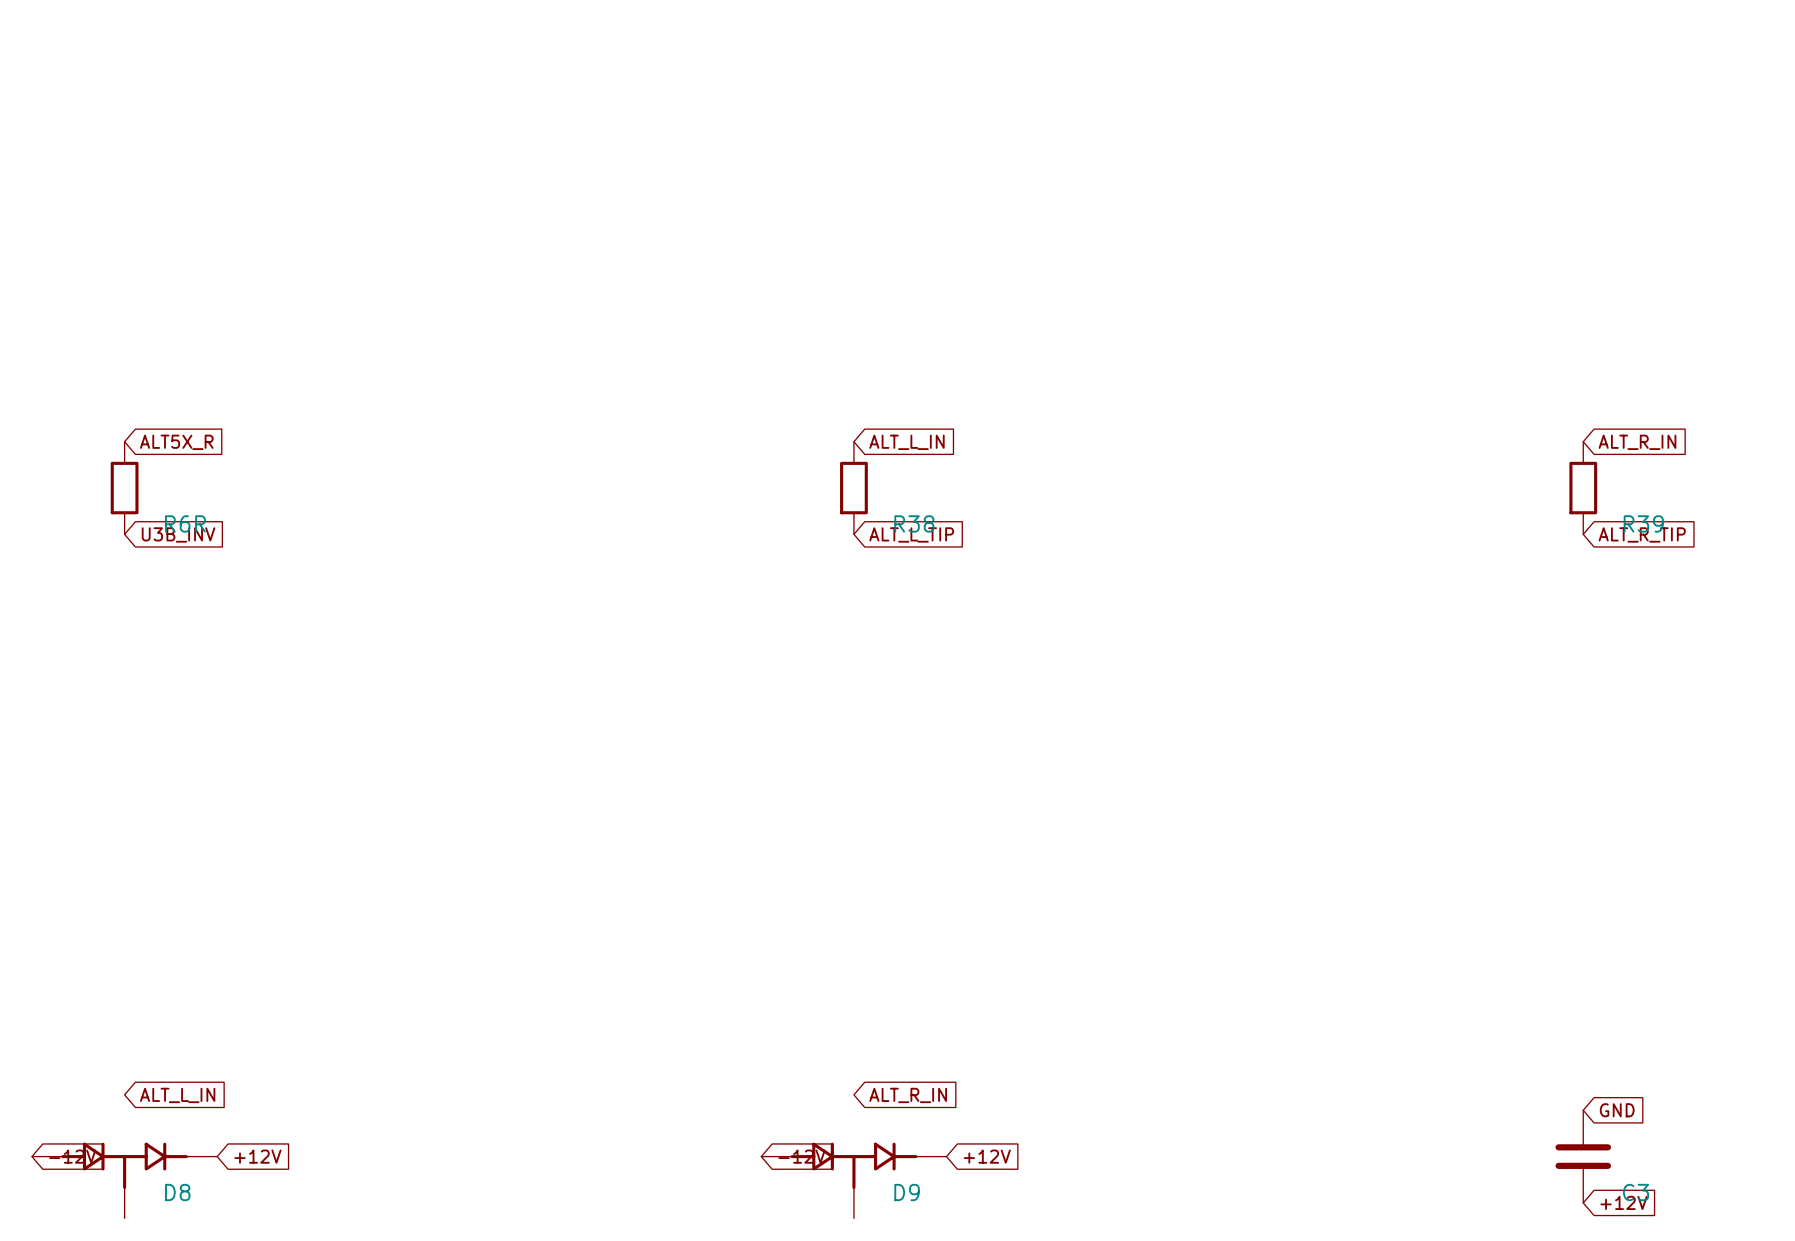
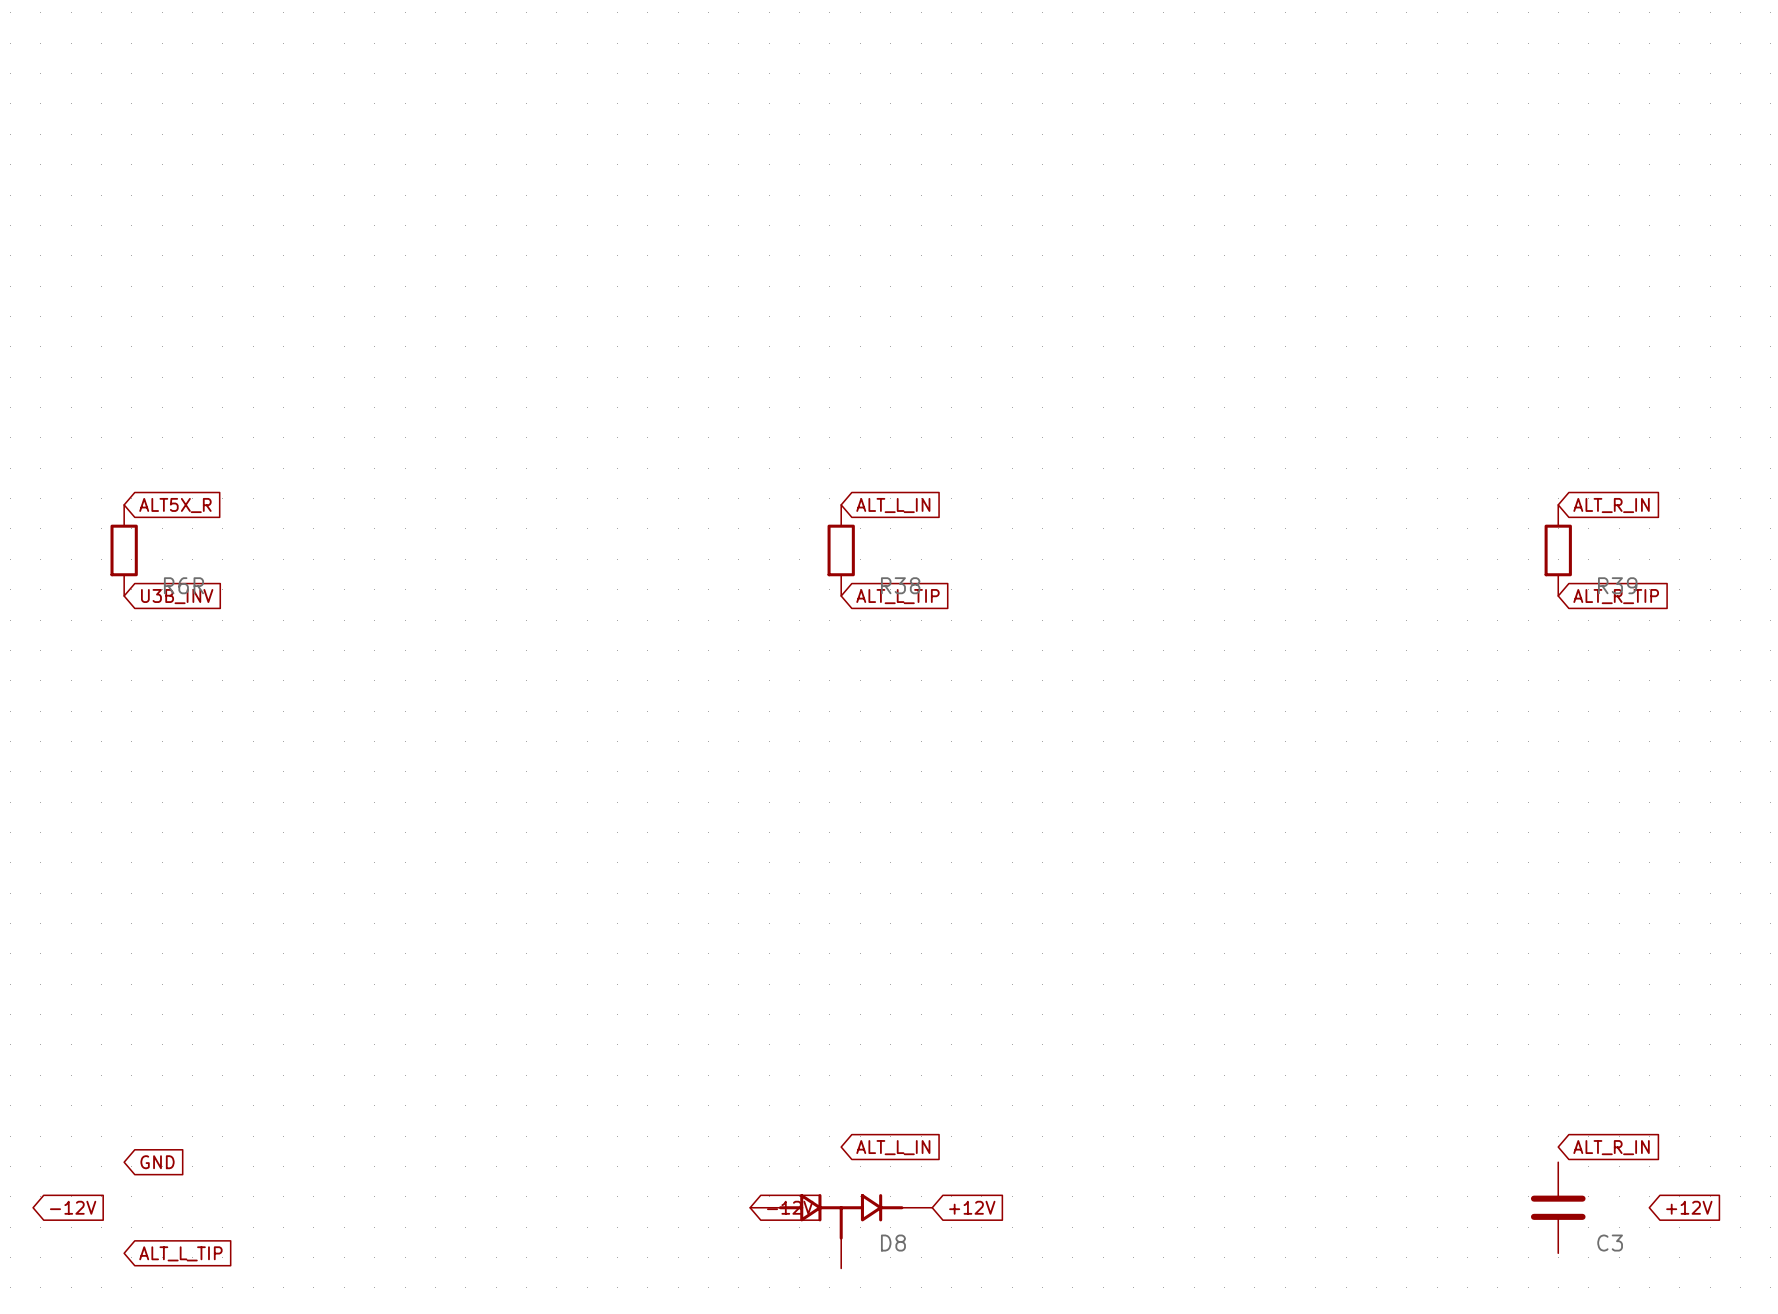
global label: ALT_L_IN (177, 1095) -> none
global label: ALT_R_IN (908, 1095) -> ALT_L_IN (893, 1147)
global label: none -> ALT_R_IN (1611, 1147)
global label: none -> GND (157, 1162)
global label: GND (1617, 1110) -> none
global label: +12V (257, 1156) -> none
D8: (124, 1180) -> none
D9 name: D9 (907, 1192) -> D8 (893, 1243)
global label position: +12V (1623, 1202) -> +12V (1689, 1207)
global label: none -> ALT_L_TIP (180, 1253)

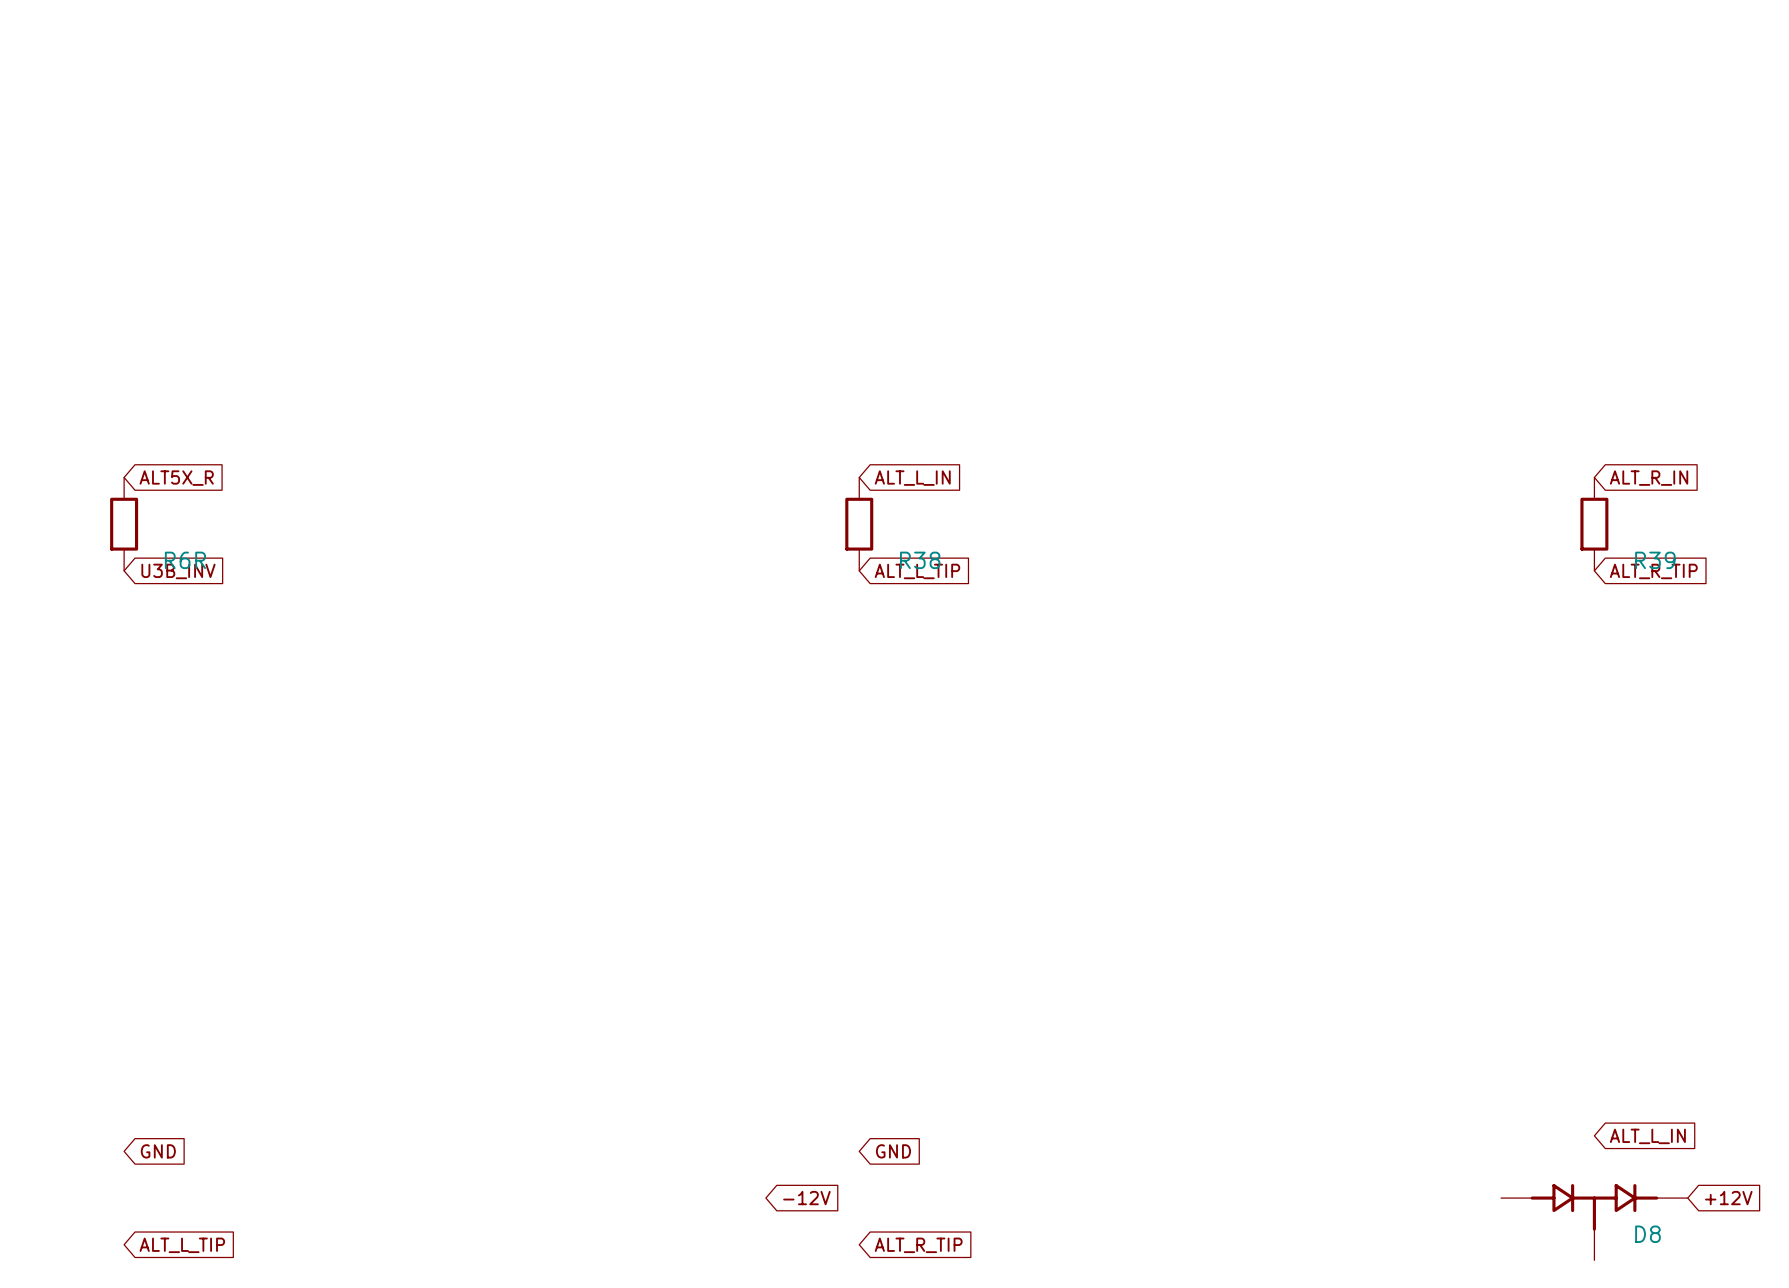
global label: ALT_L_IN (893, 1147) -> none
global label: ALT_R_IN (1611, 1147) -> ALT_L_IN (1647, 1136)
global label: none -> GND (893, 1151)
global label: -12V (73, 1207) -> none
global label: +12V (972, 1207) -> none
C3: (1558, 1207) -> none
D8 position: (841, 1231) -> (1594, 1222)
global label: none -> ALT_R_TIP (918, 1245)

